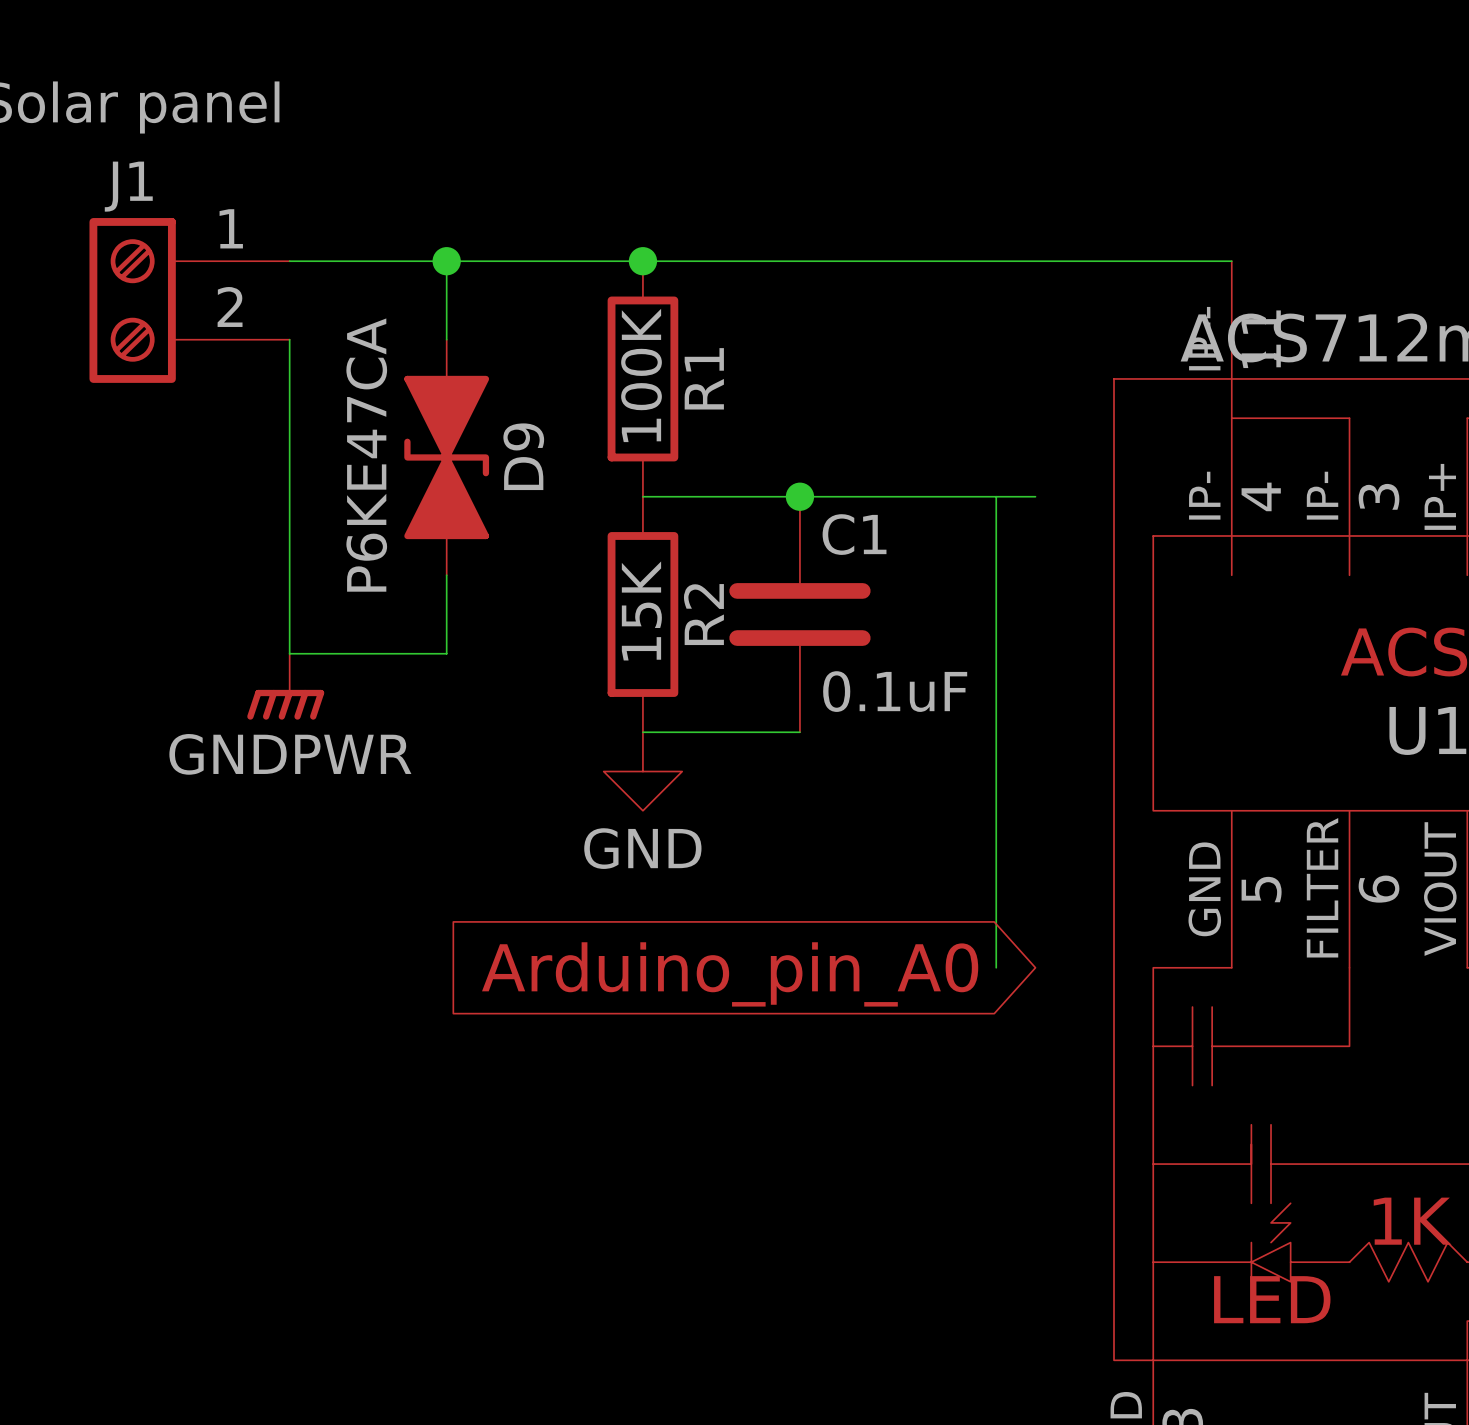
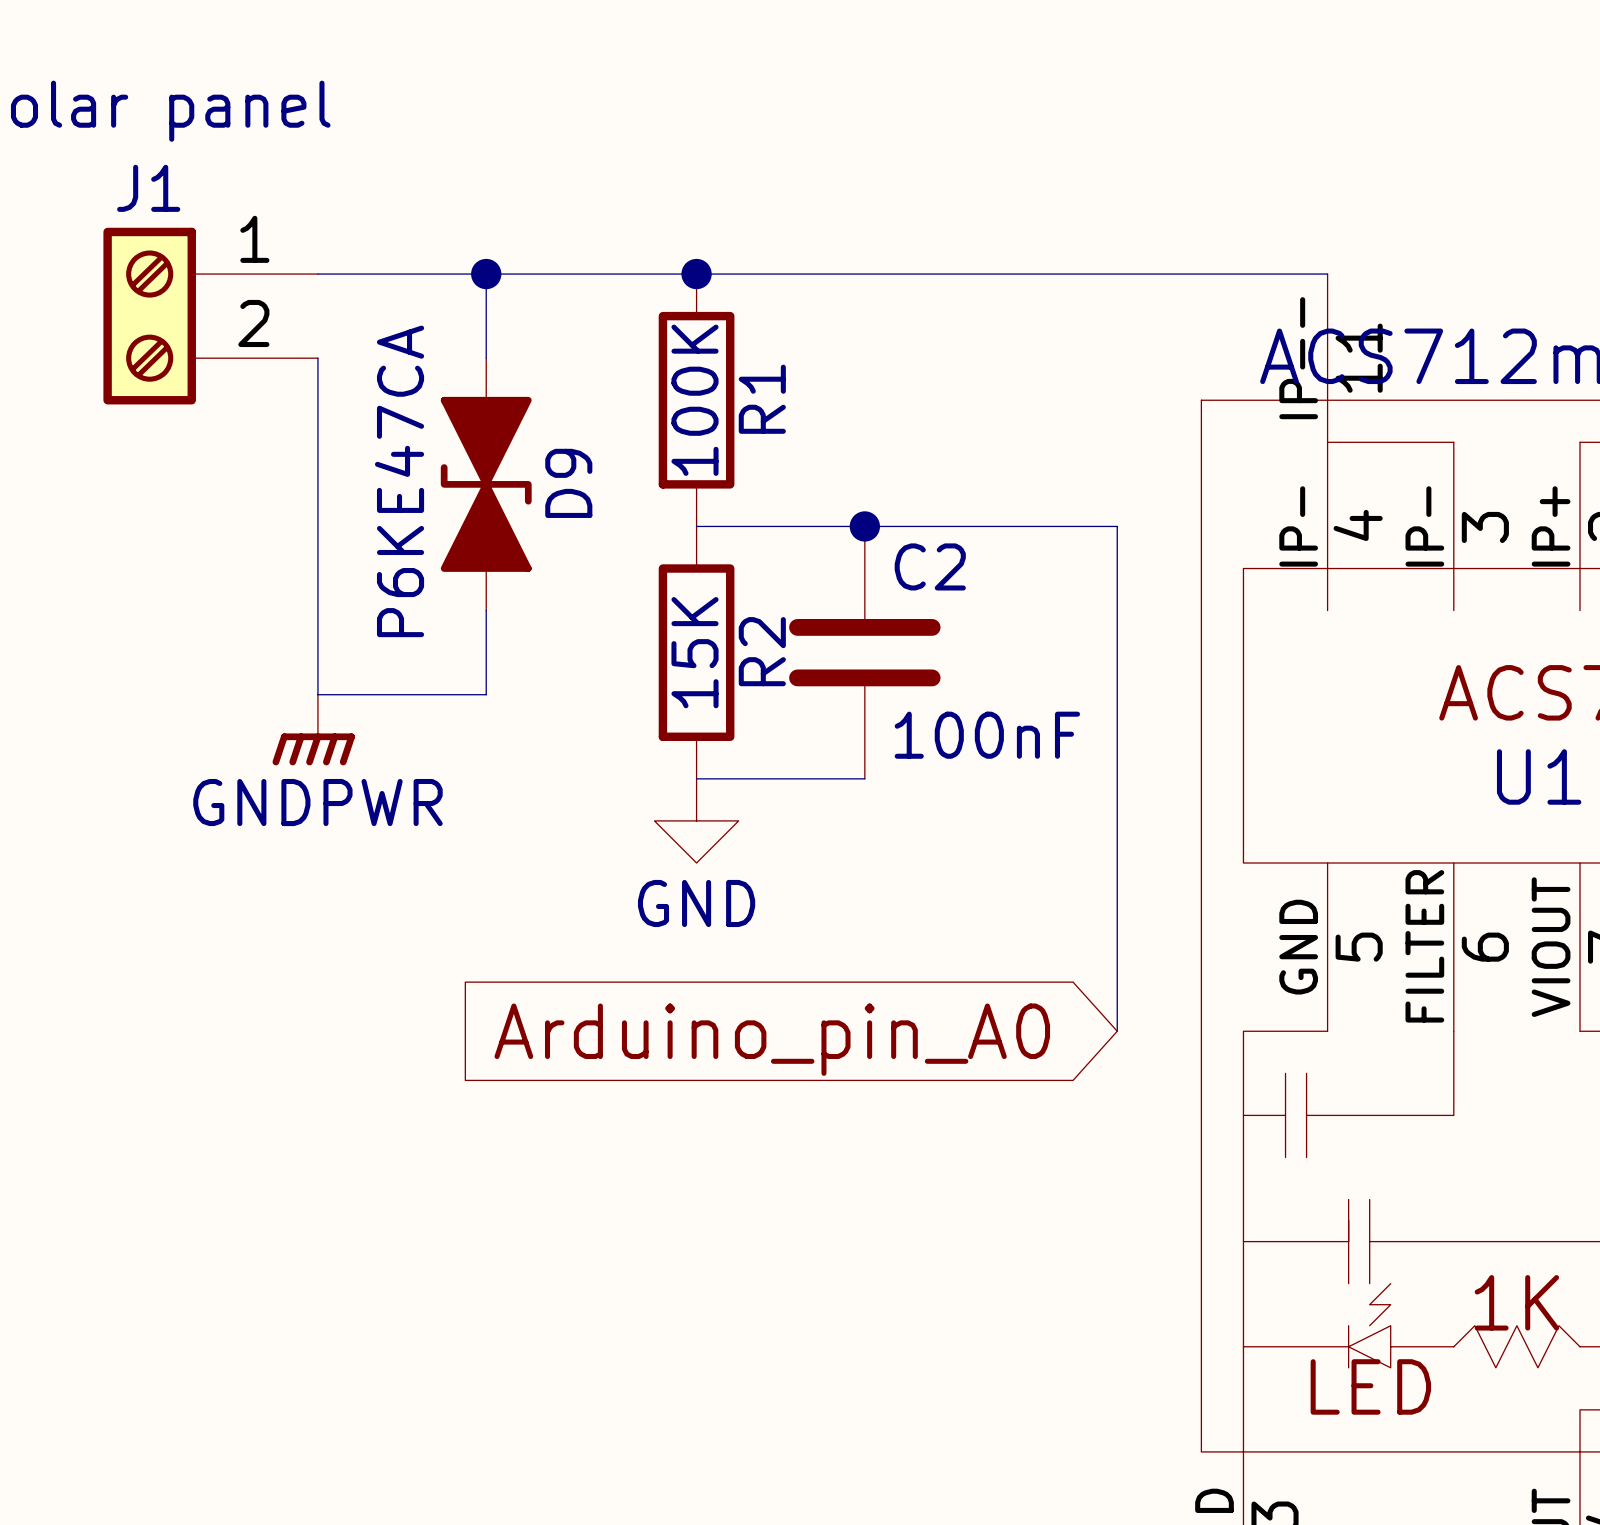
wire: (996, 496) (996, 967) -> (1117, 526) (1117, 1031)
C1 name: C1 (854, 534) -> C2 (930, 566)
C1 value: 0.1uF (895, 691) -> 100nF (987, 735)

